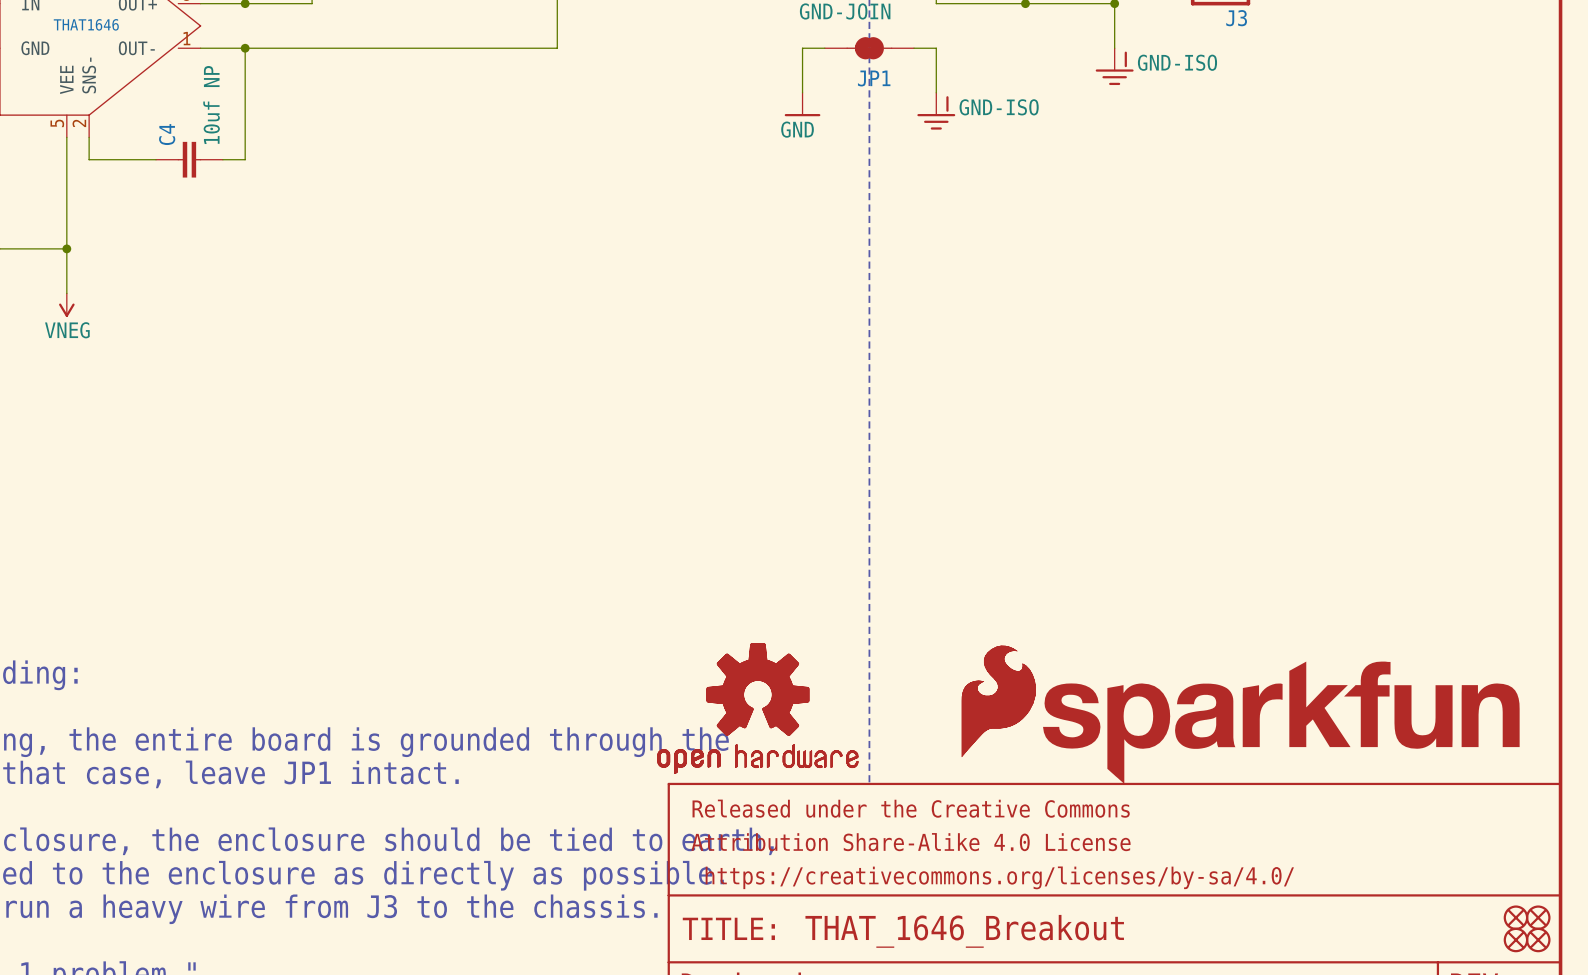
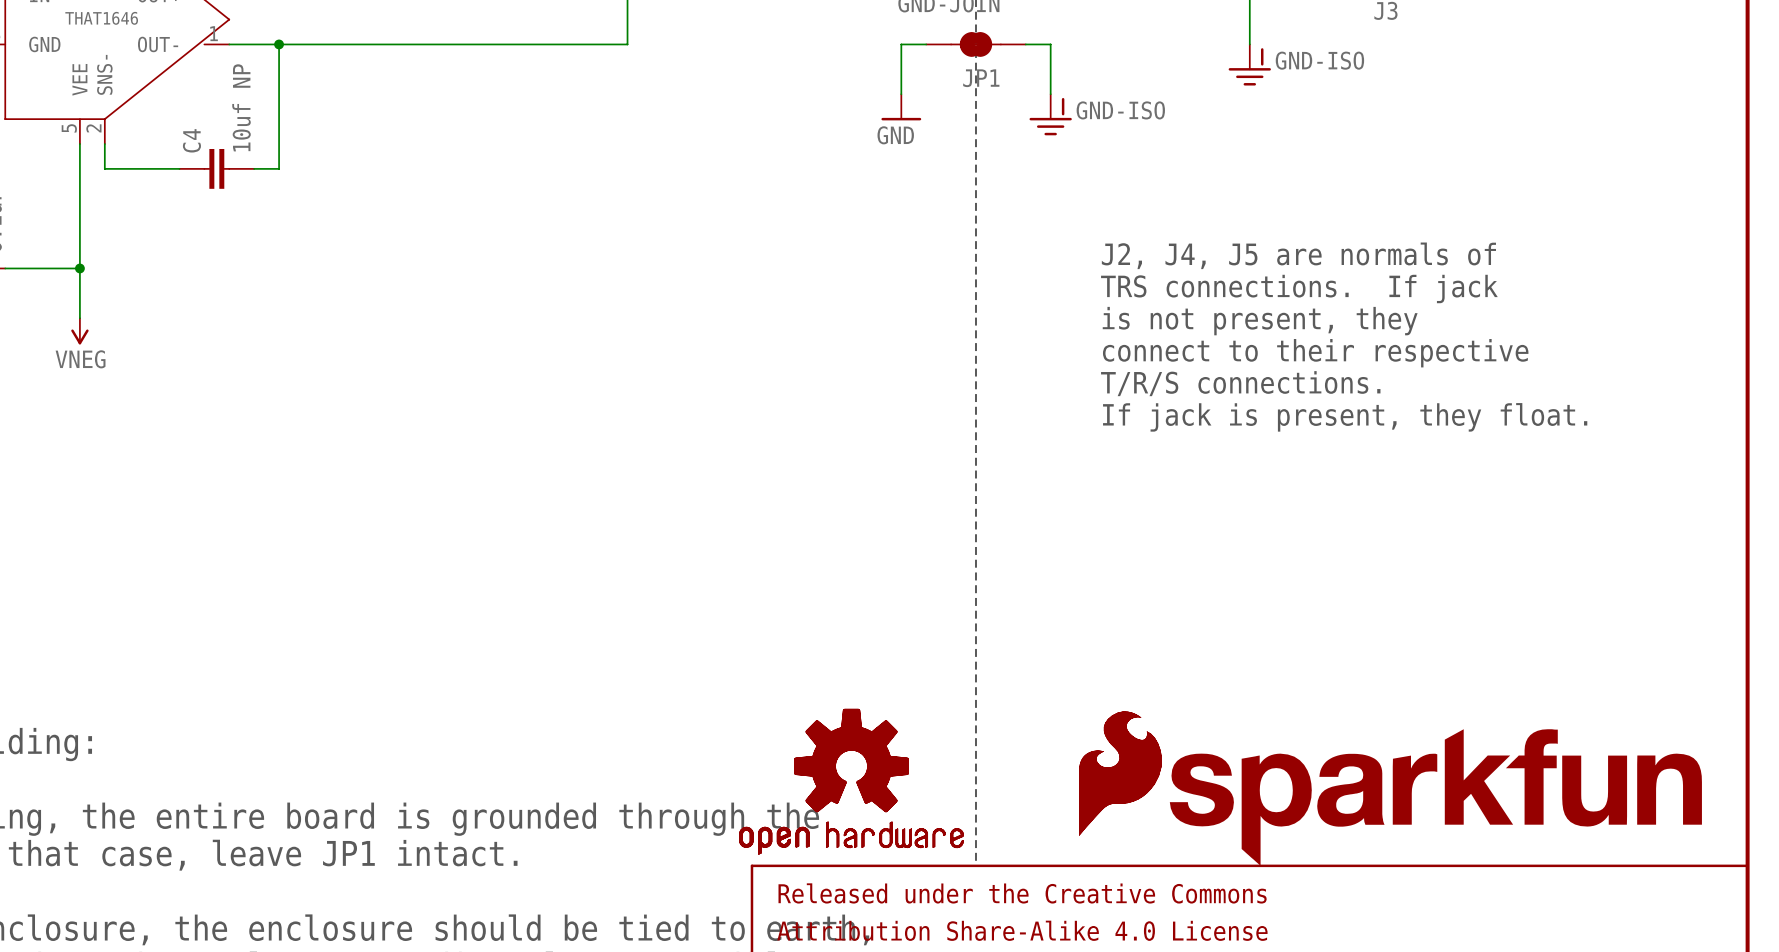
text: none -> J2, J4, J5 are normals of (1298, 255)
text: none -> TRS connections. If jack (1299, 288)
text: none -> is not present, they (1260, 321)
text: none -> connect to their respective (1315, 353)
text: none -> T/R/S connections. (1240, 383)
text: none -> If jack is present, they float. (1345, 417)

